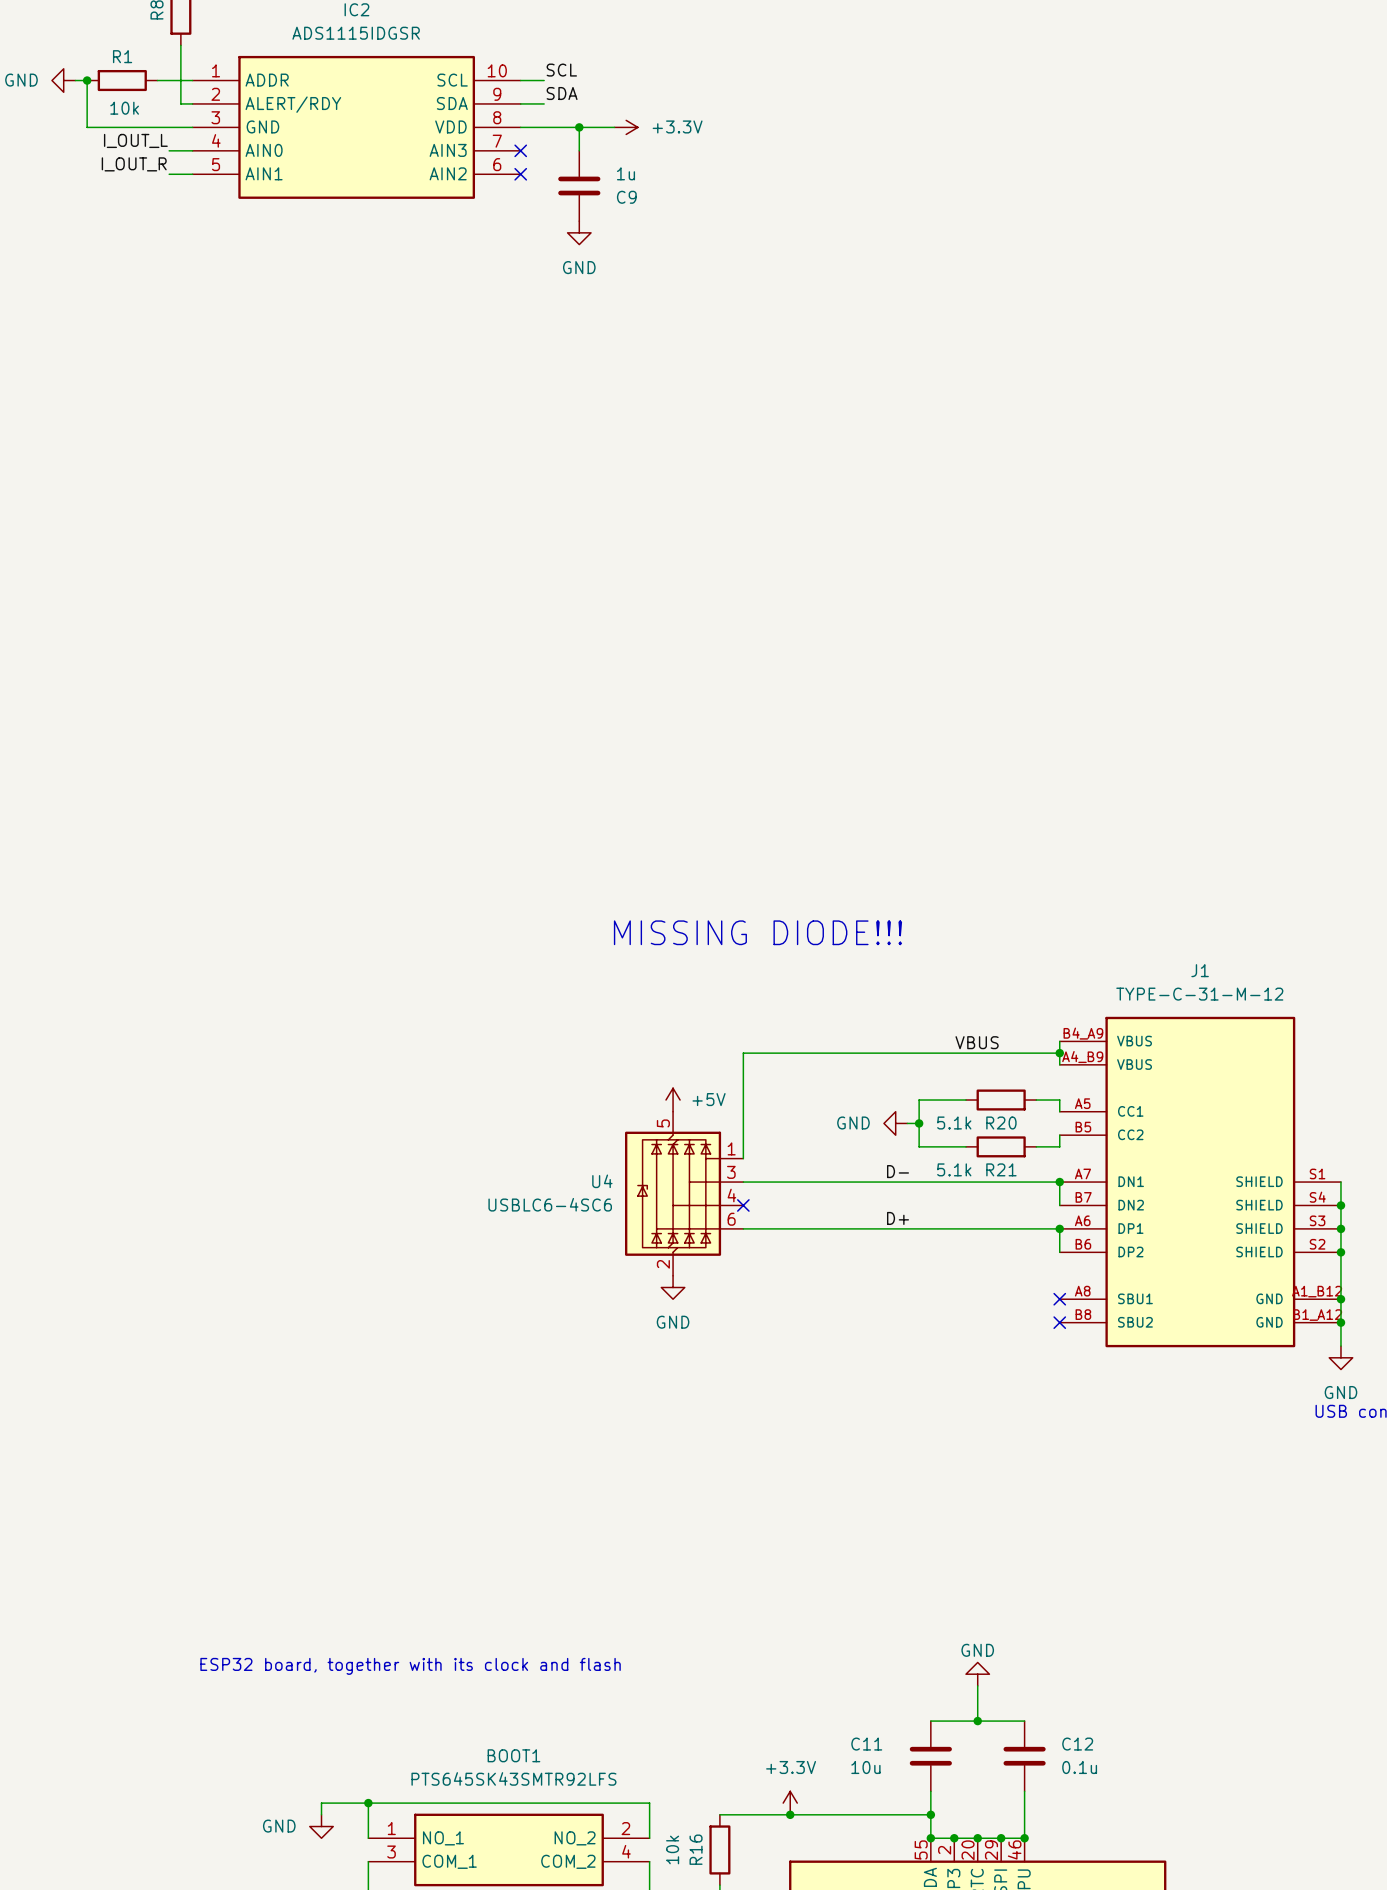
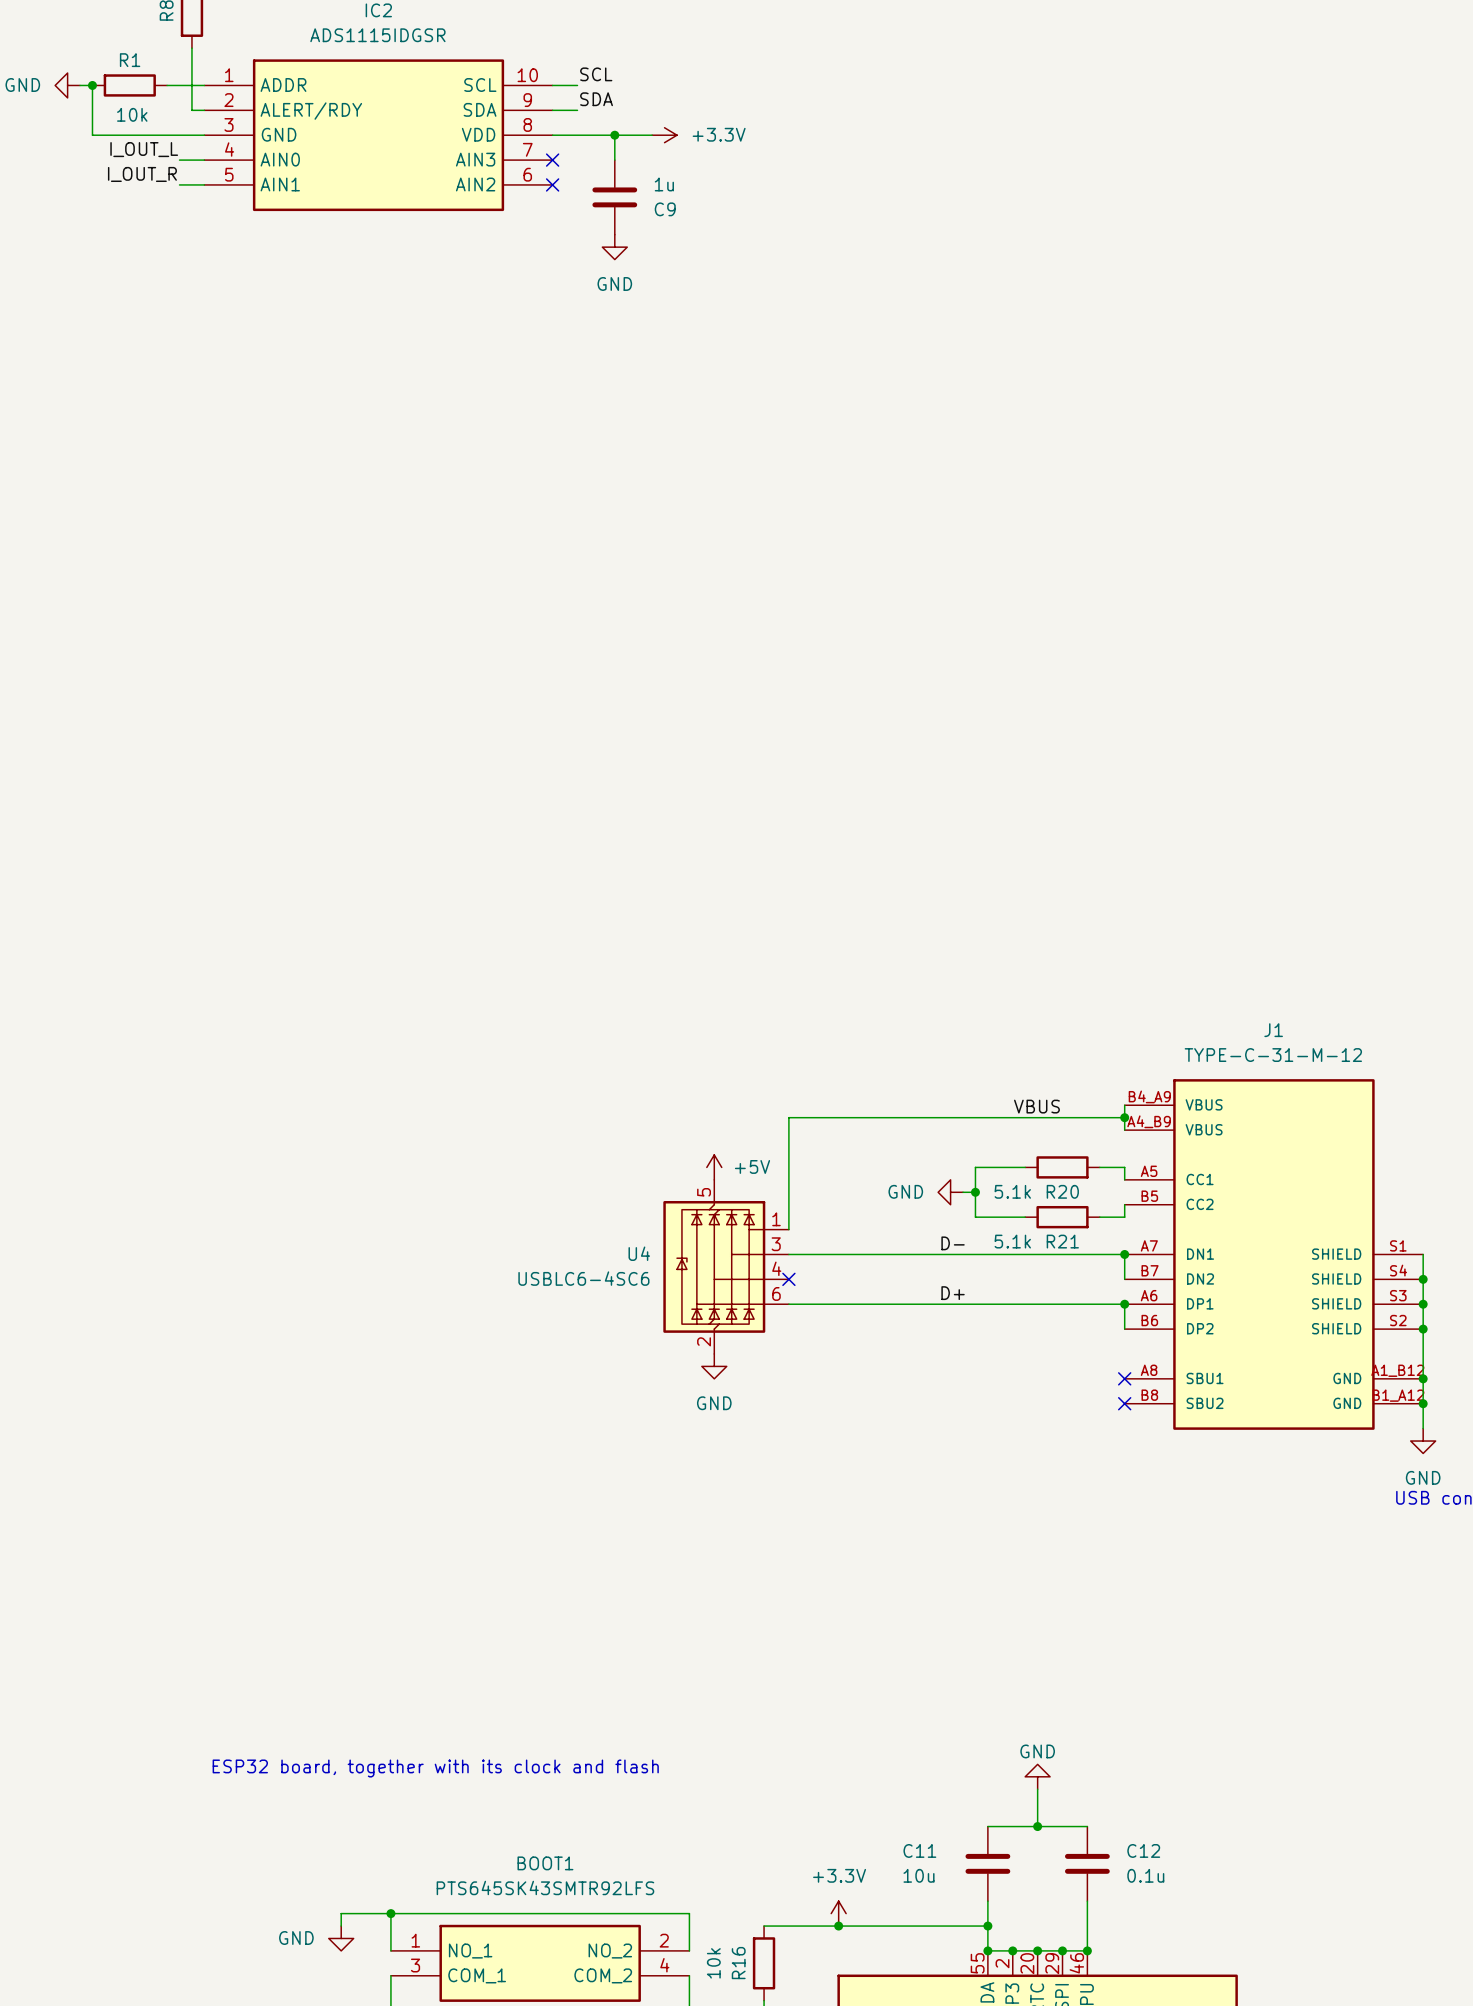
text: MISSING DIODE!!! (757, 932) -> none

